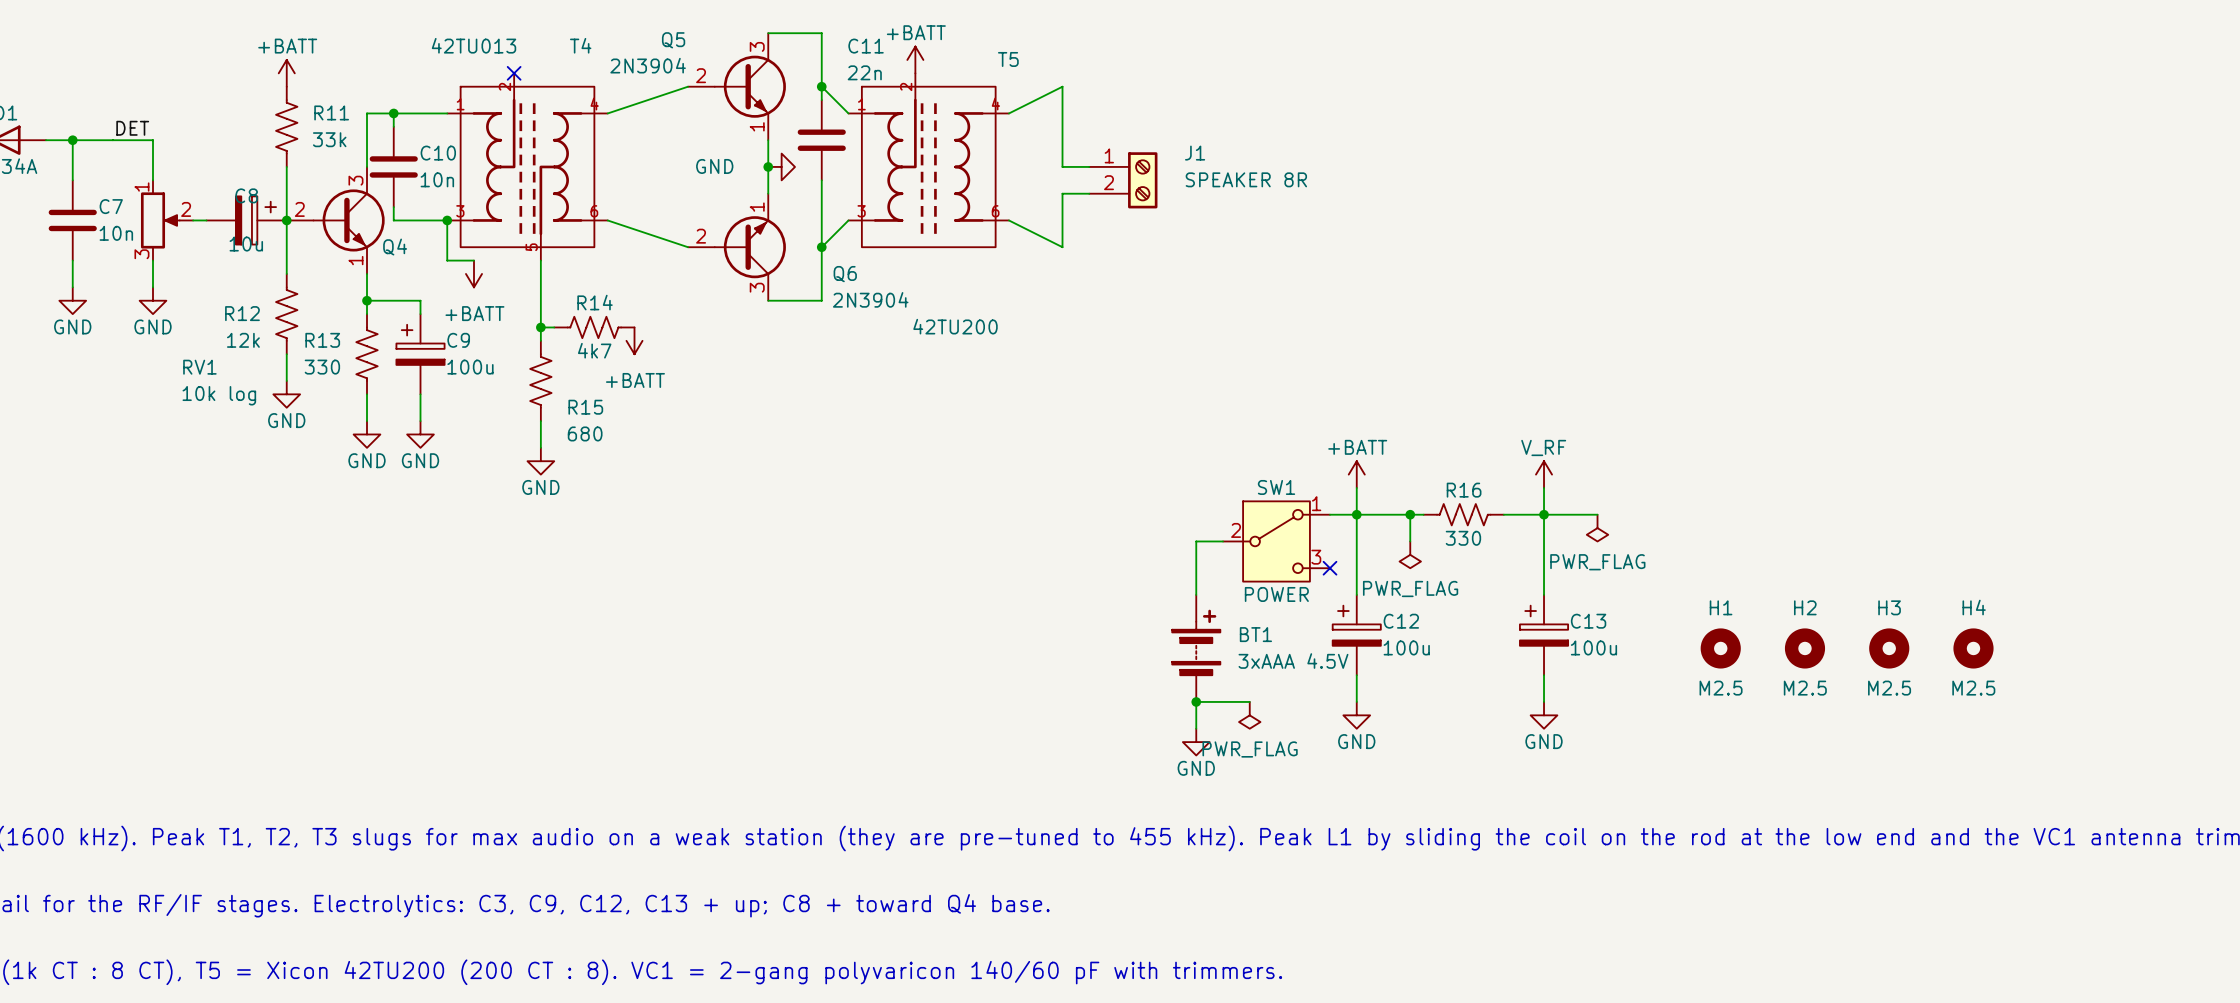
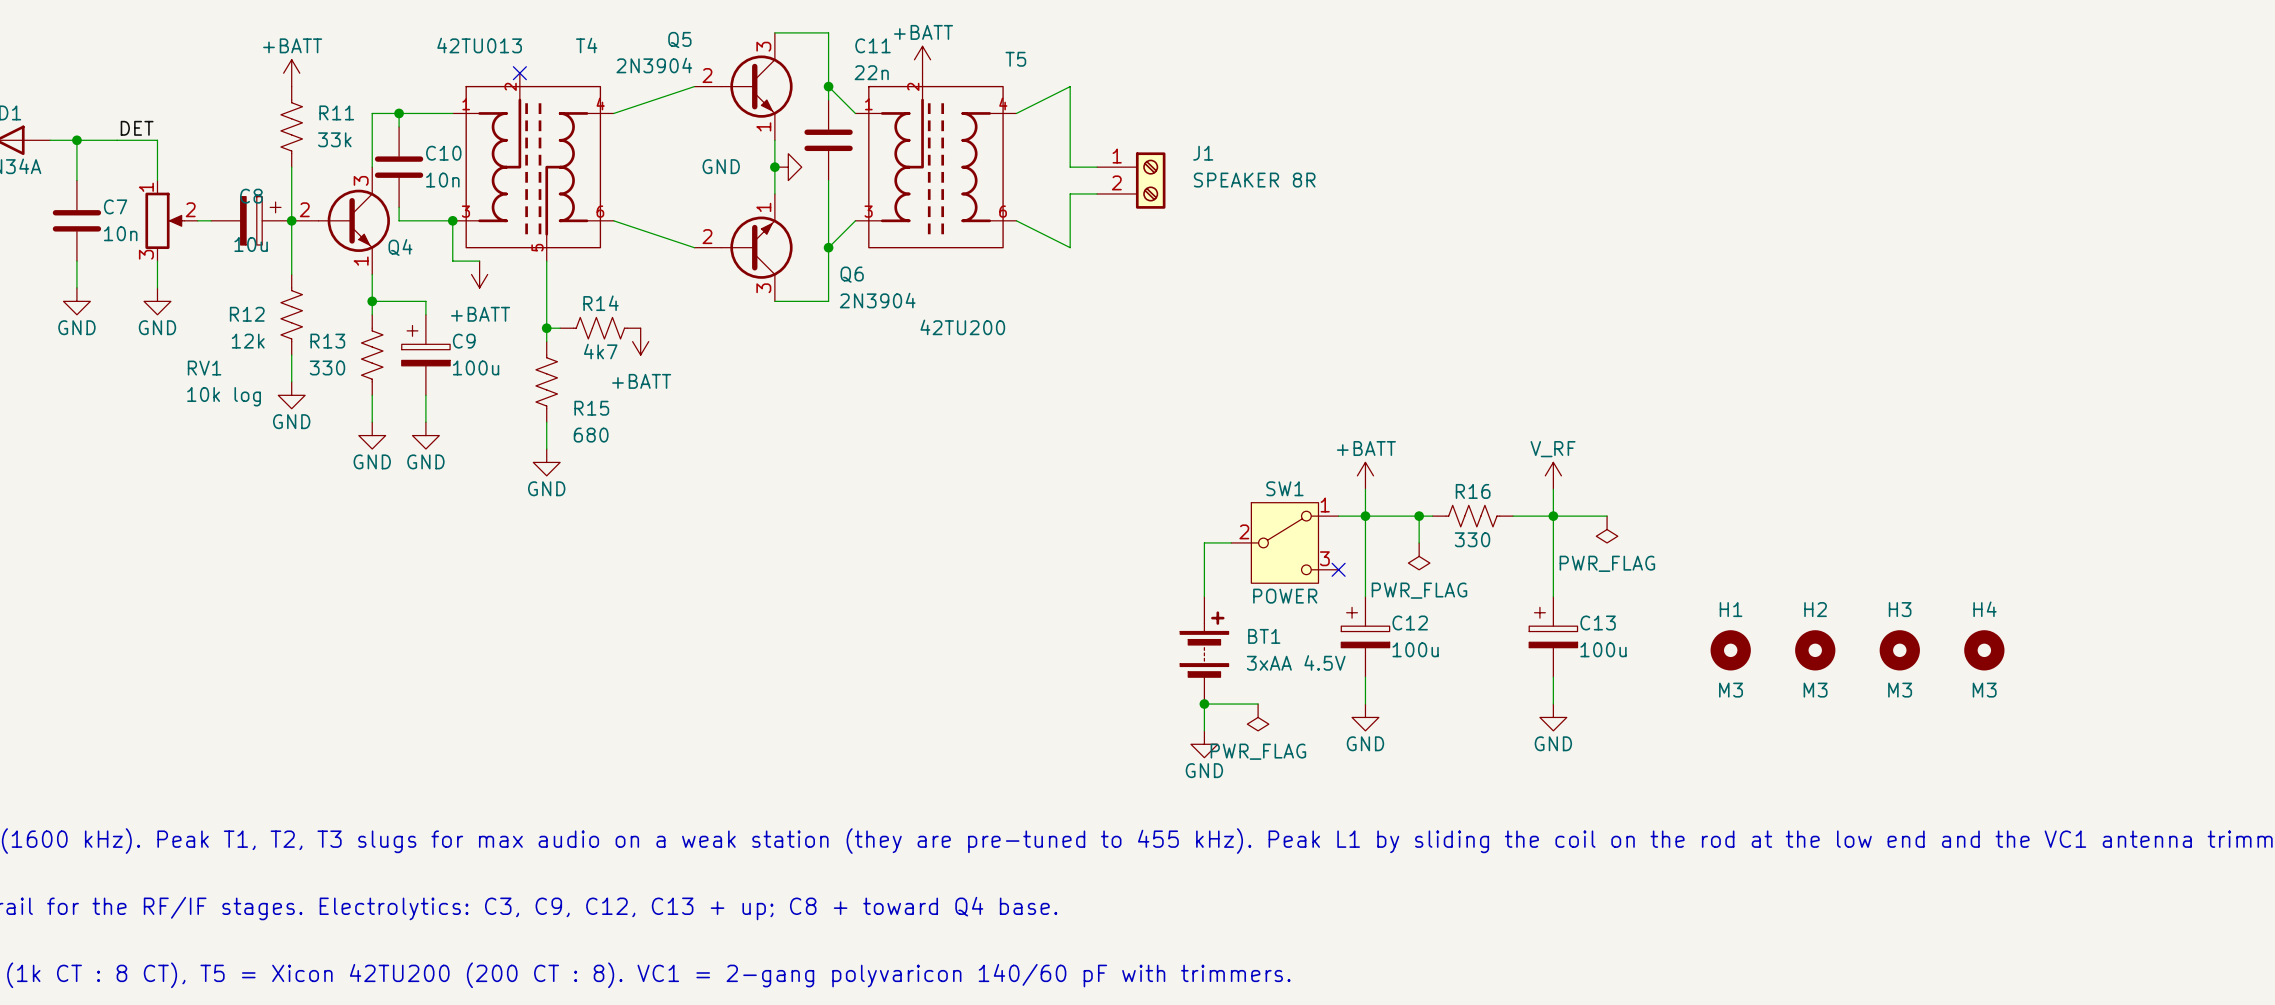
BT1 value: 3xAAA 4.5V (1293, 661) -> 3xAA 4.5V (1296, 662)
H1 value: M2.5 (1721, 688) -> M3 (1731, 690)
H2 value: M2.5 (1805, 688) -> M3 (1815, 690)
H3 value: M2.5 (1889, 688) -> M3 (1900, 690)
H4 value: M2.5 (1973, 688) -> M3 (1984, 690)

